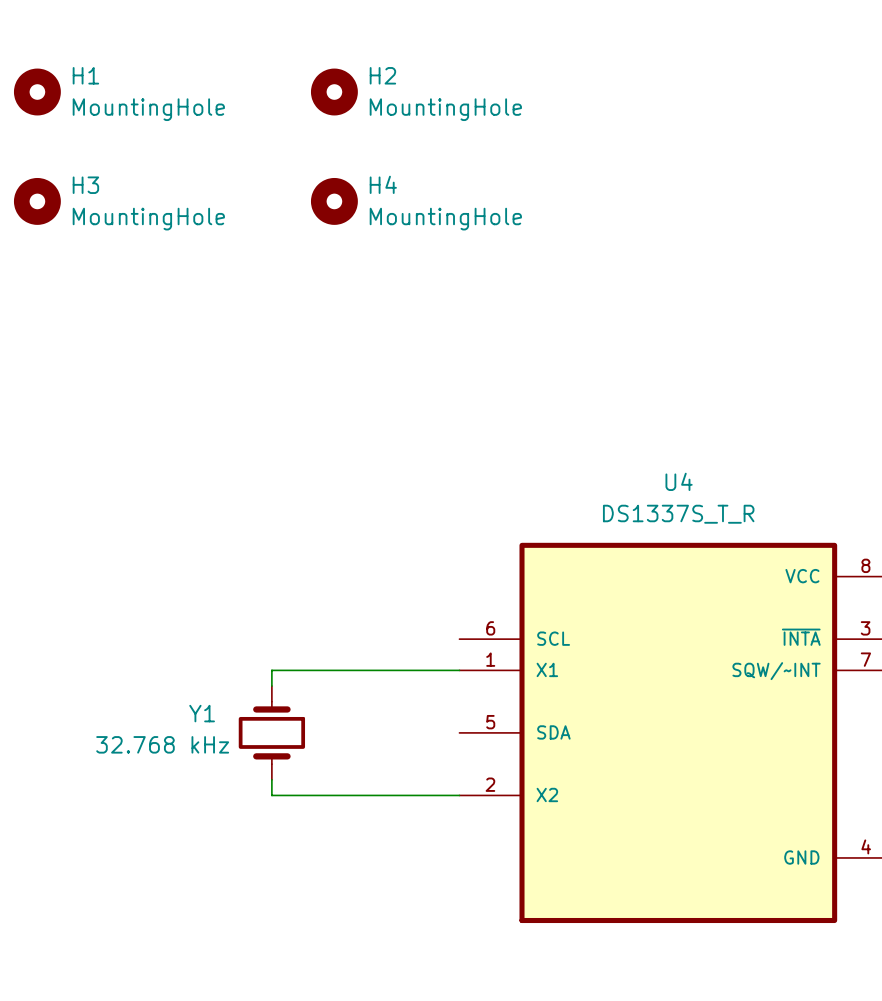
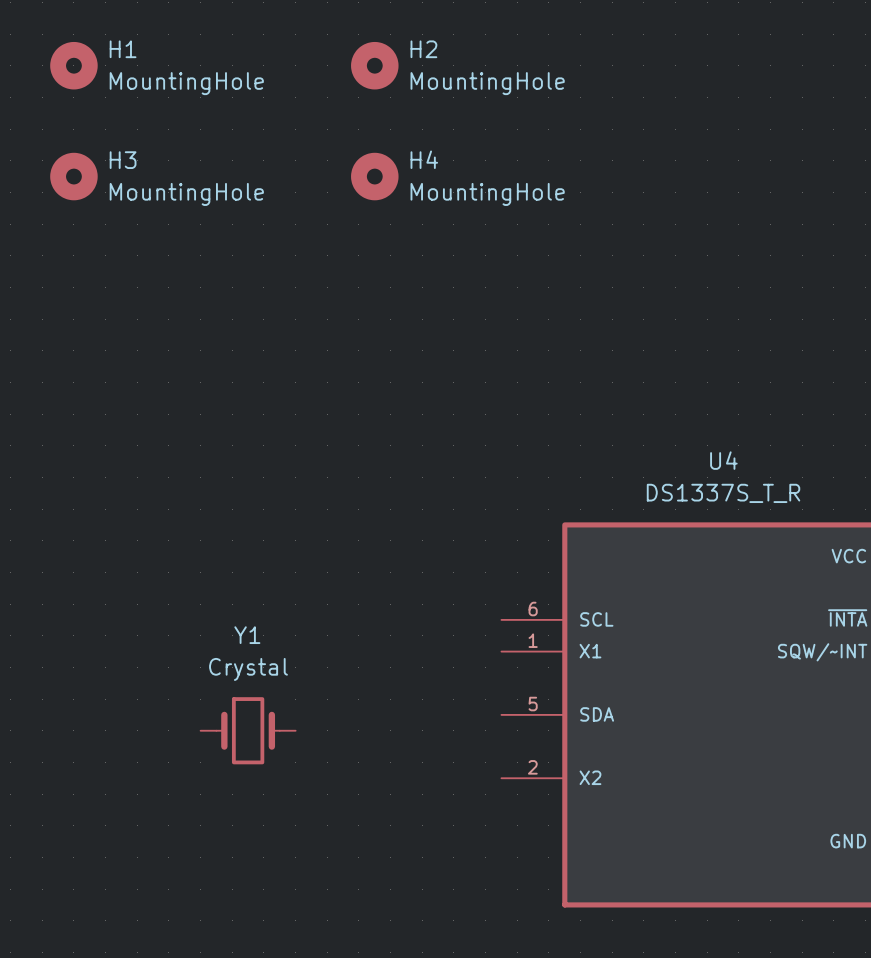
wire: (459, 670) (271, 670) (271, 686) -> none
Y1 name position: Y1 (202, 713) -> Y1 (247, 635)
Y1 rotation: 0° (271, 732) -> 90° clockwise (248, 730)
Y1 position: (271, 732) -> (248, 730)
Y1 value: 32.768 kHz (162, 744) -> Crystal (248, 669)
wire: (271, 779) (271, 795) (459, 795) -> none

